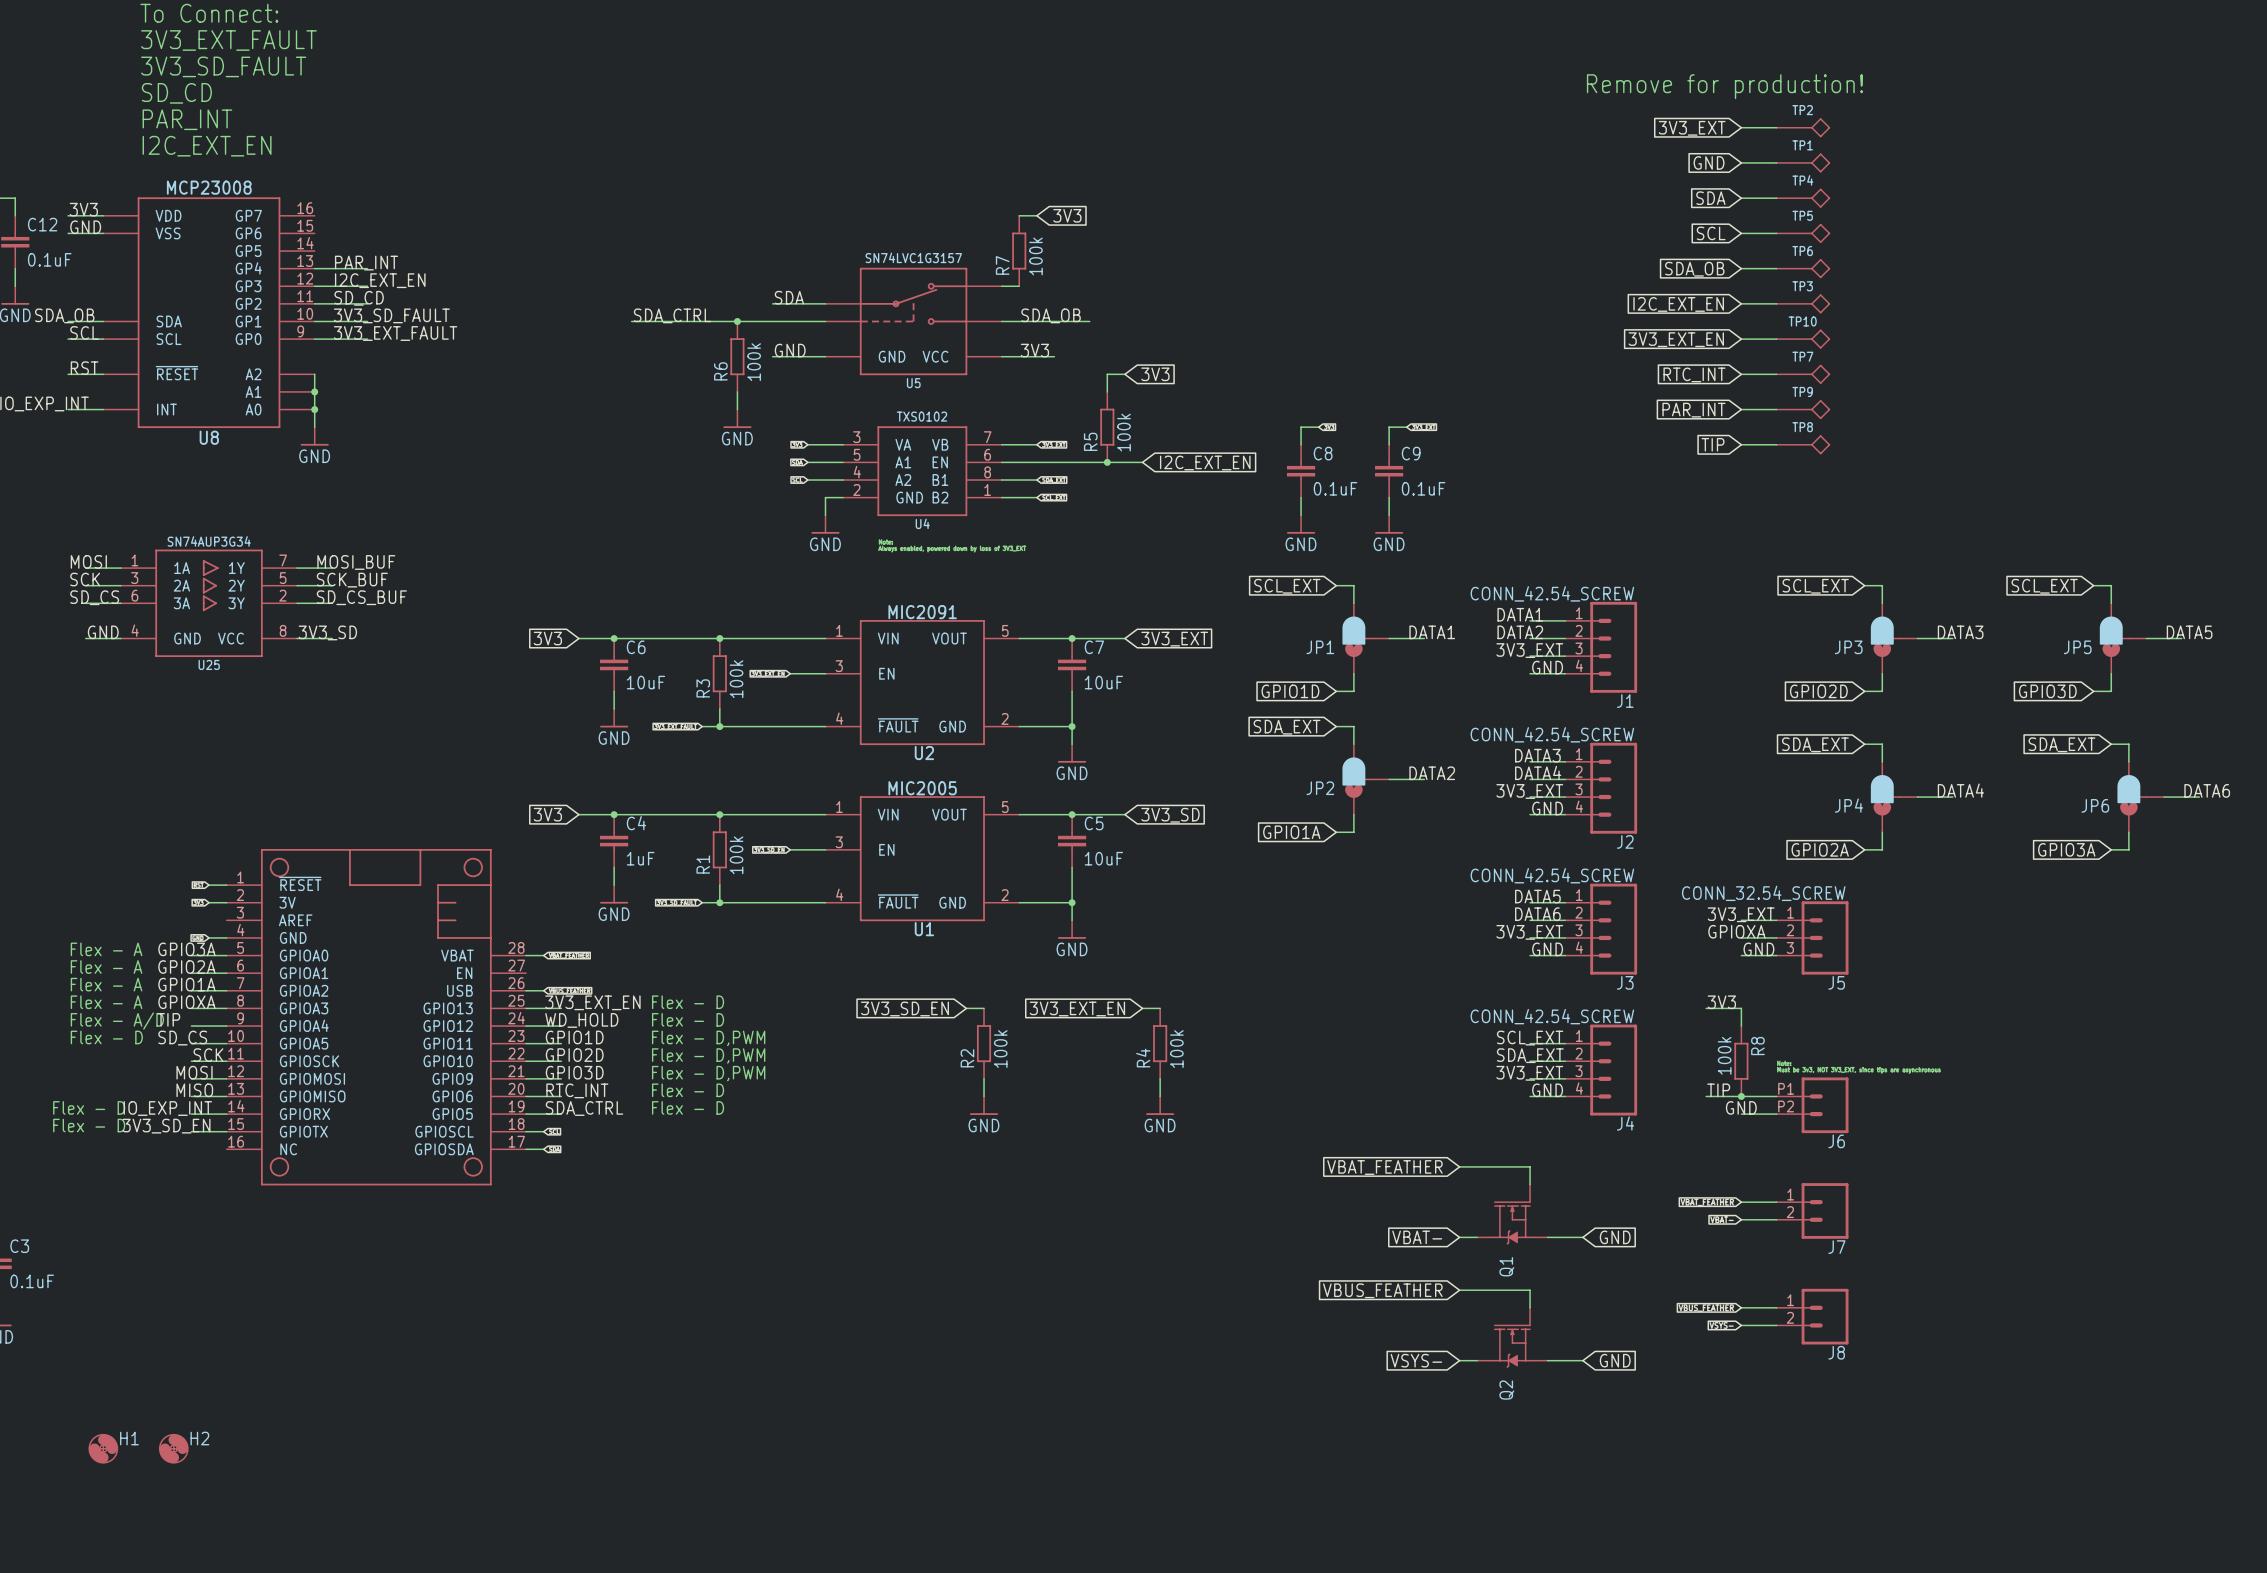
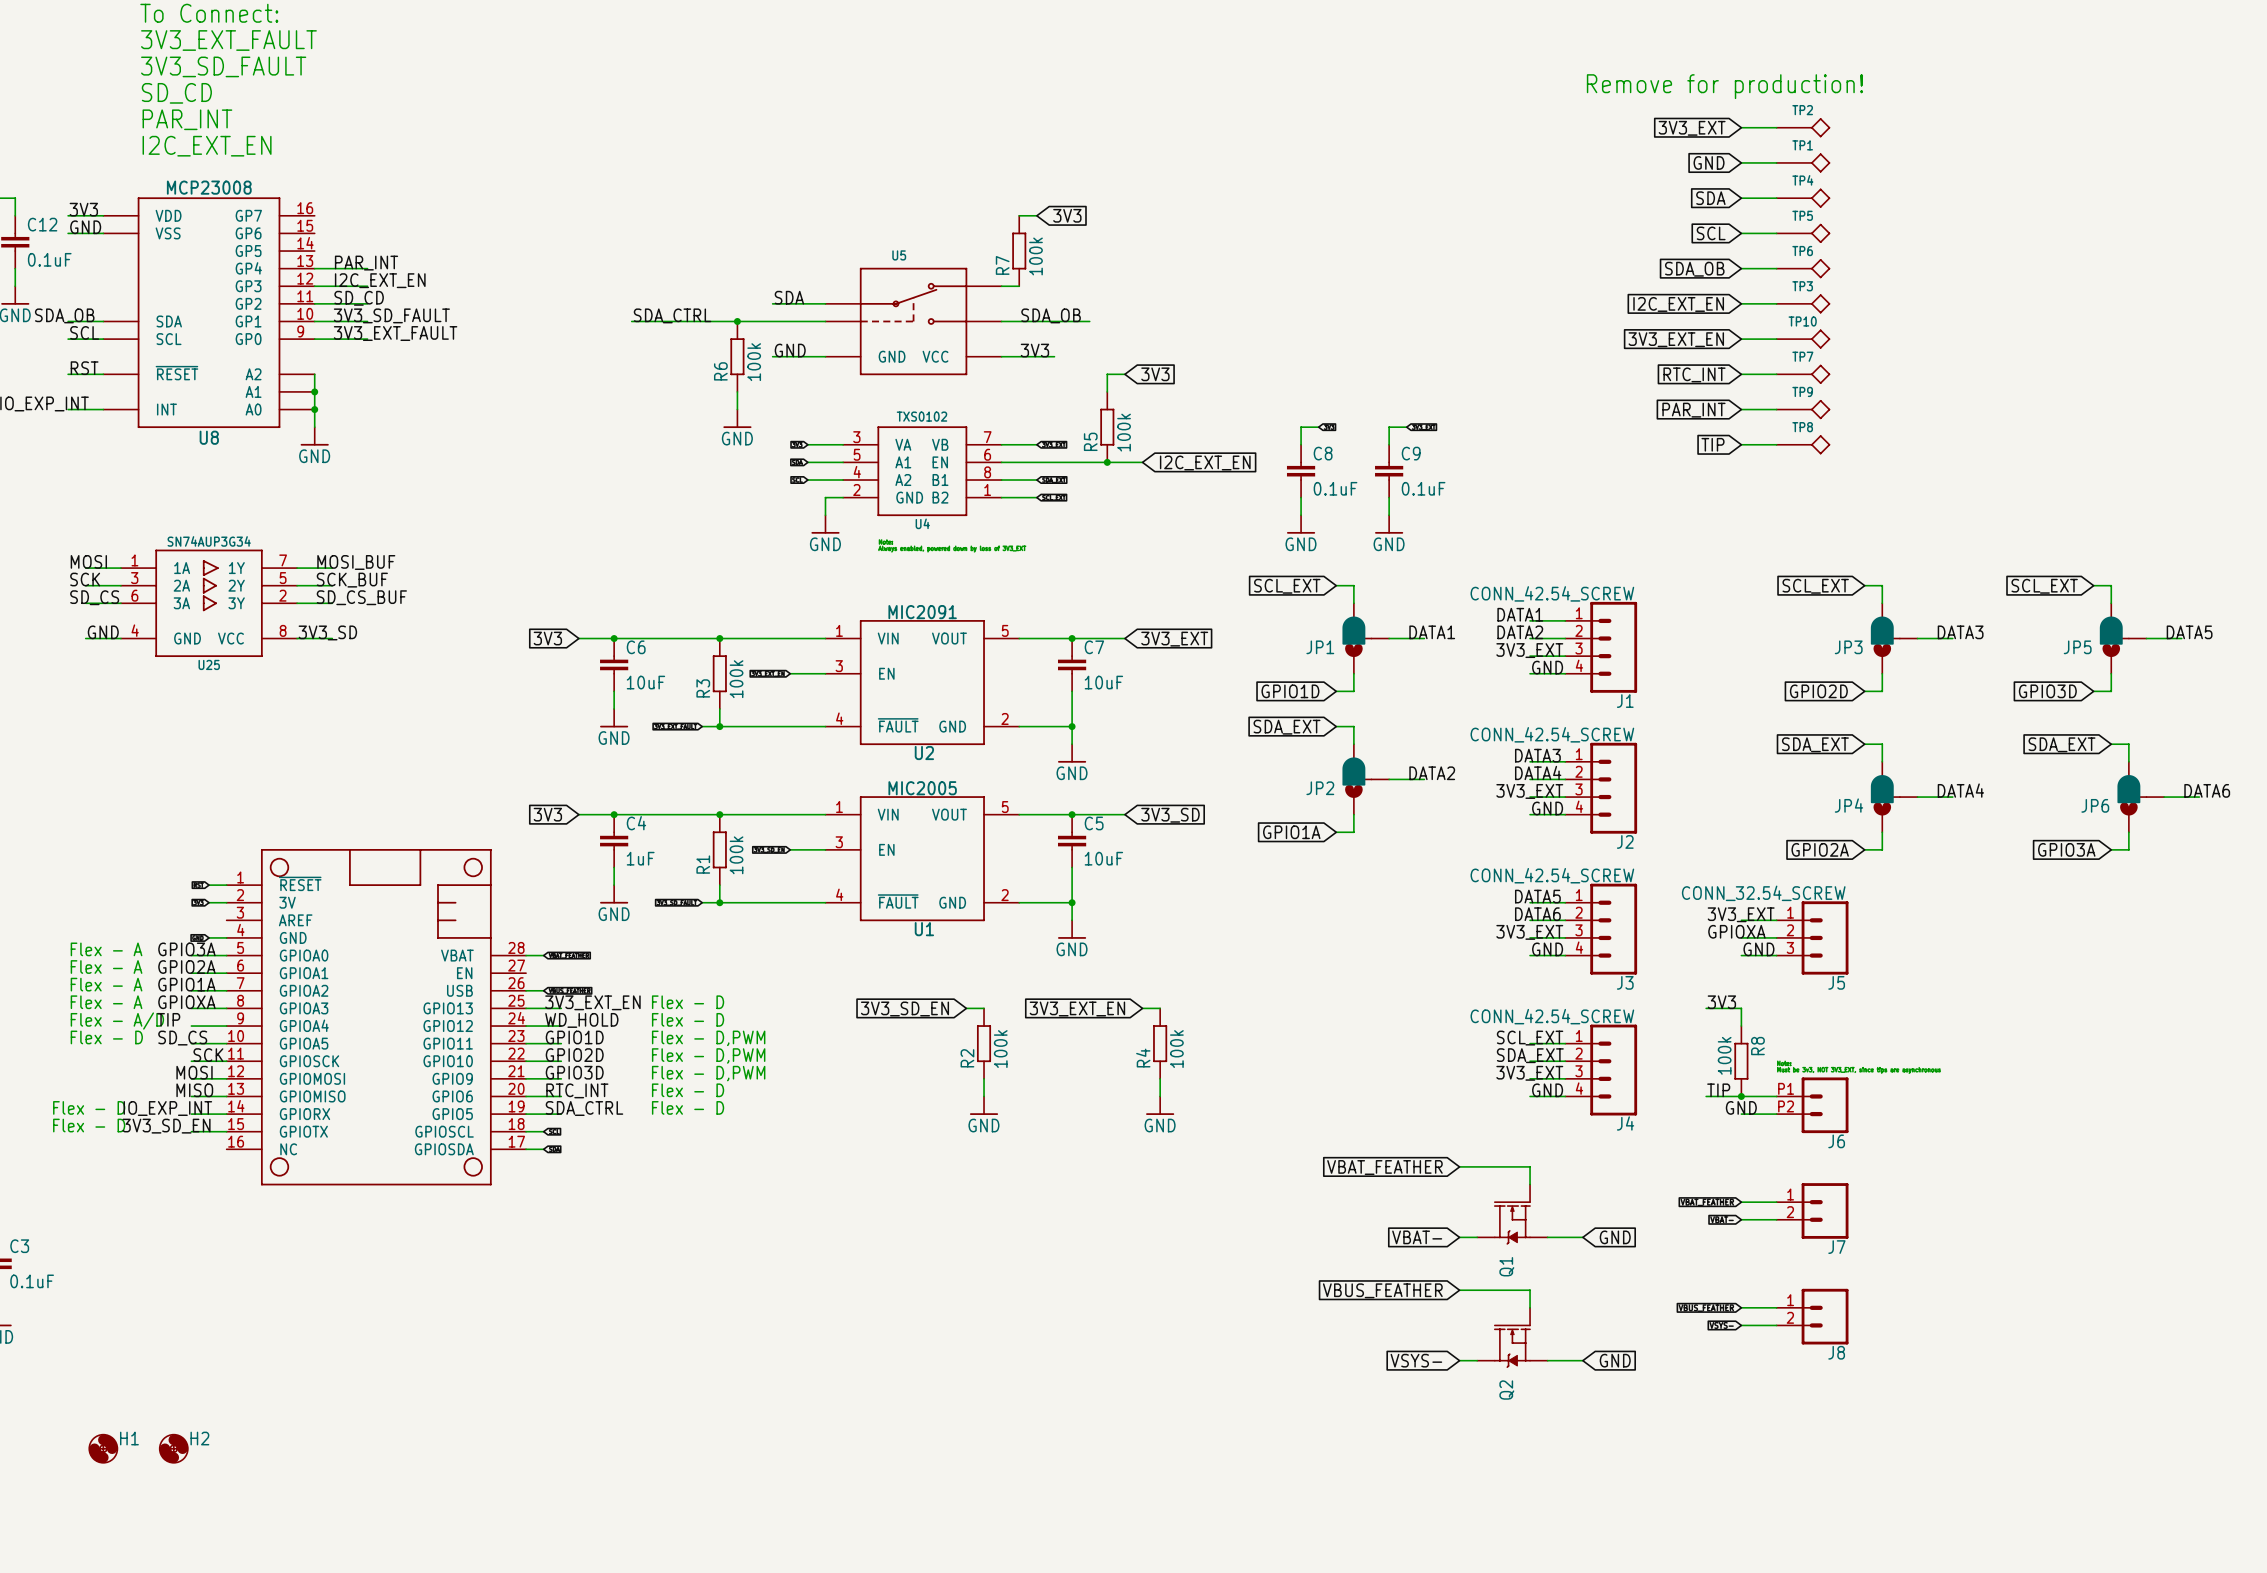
U5 text: SN74LVC1G3157 (913, 257) -> none
U5 name position: U5 (913, 383) -> U5 (899, 255)

